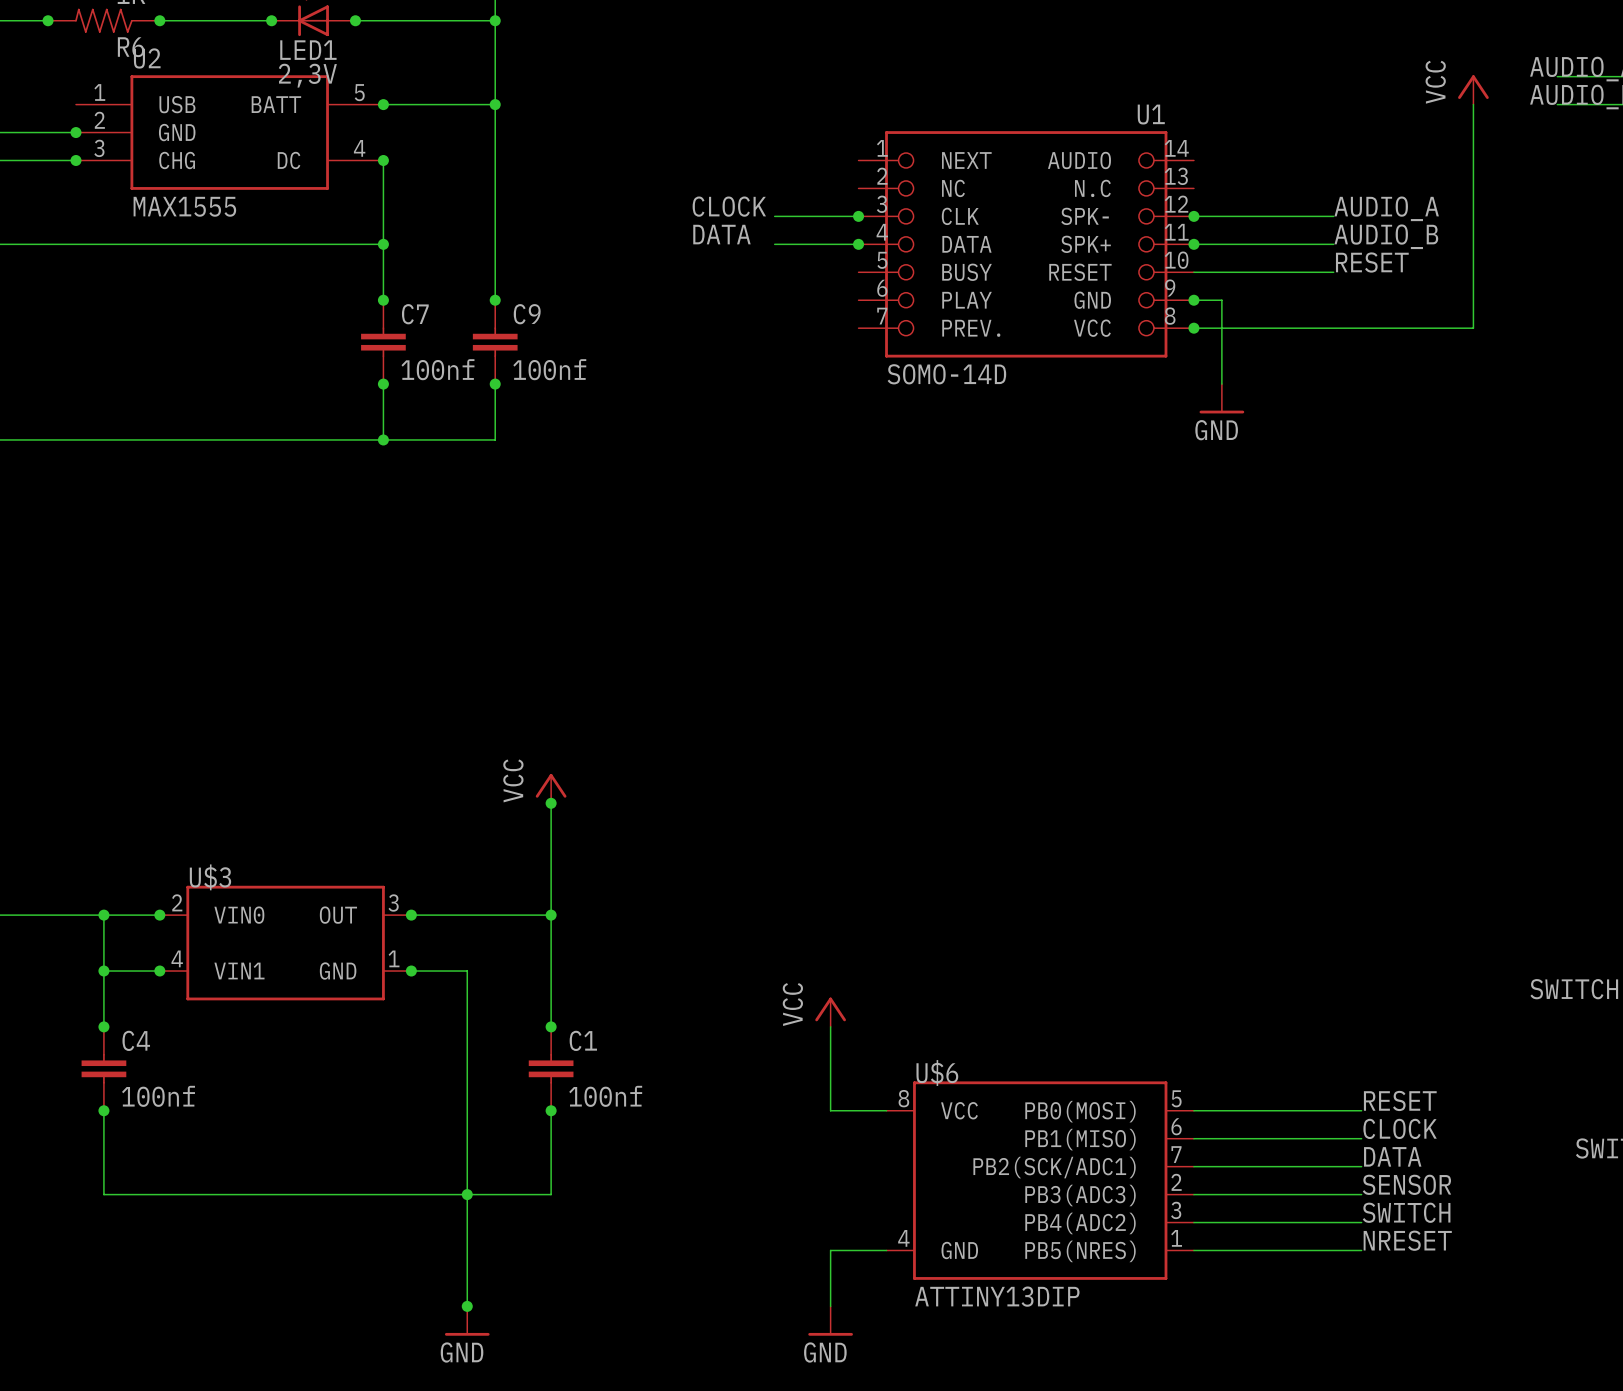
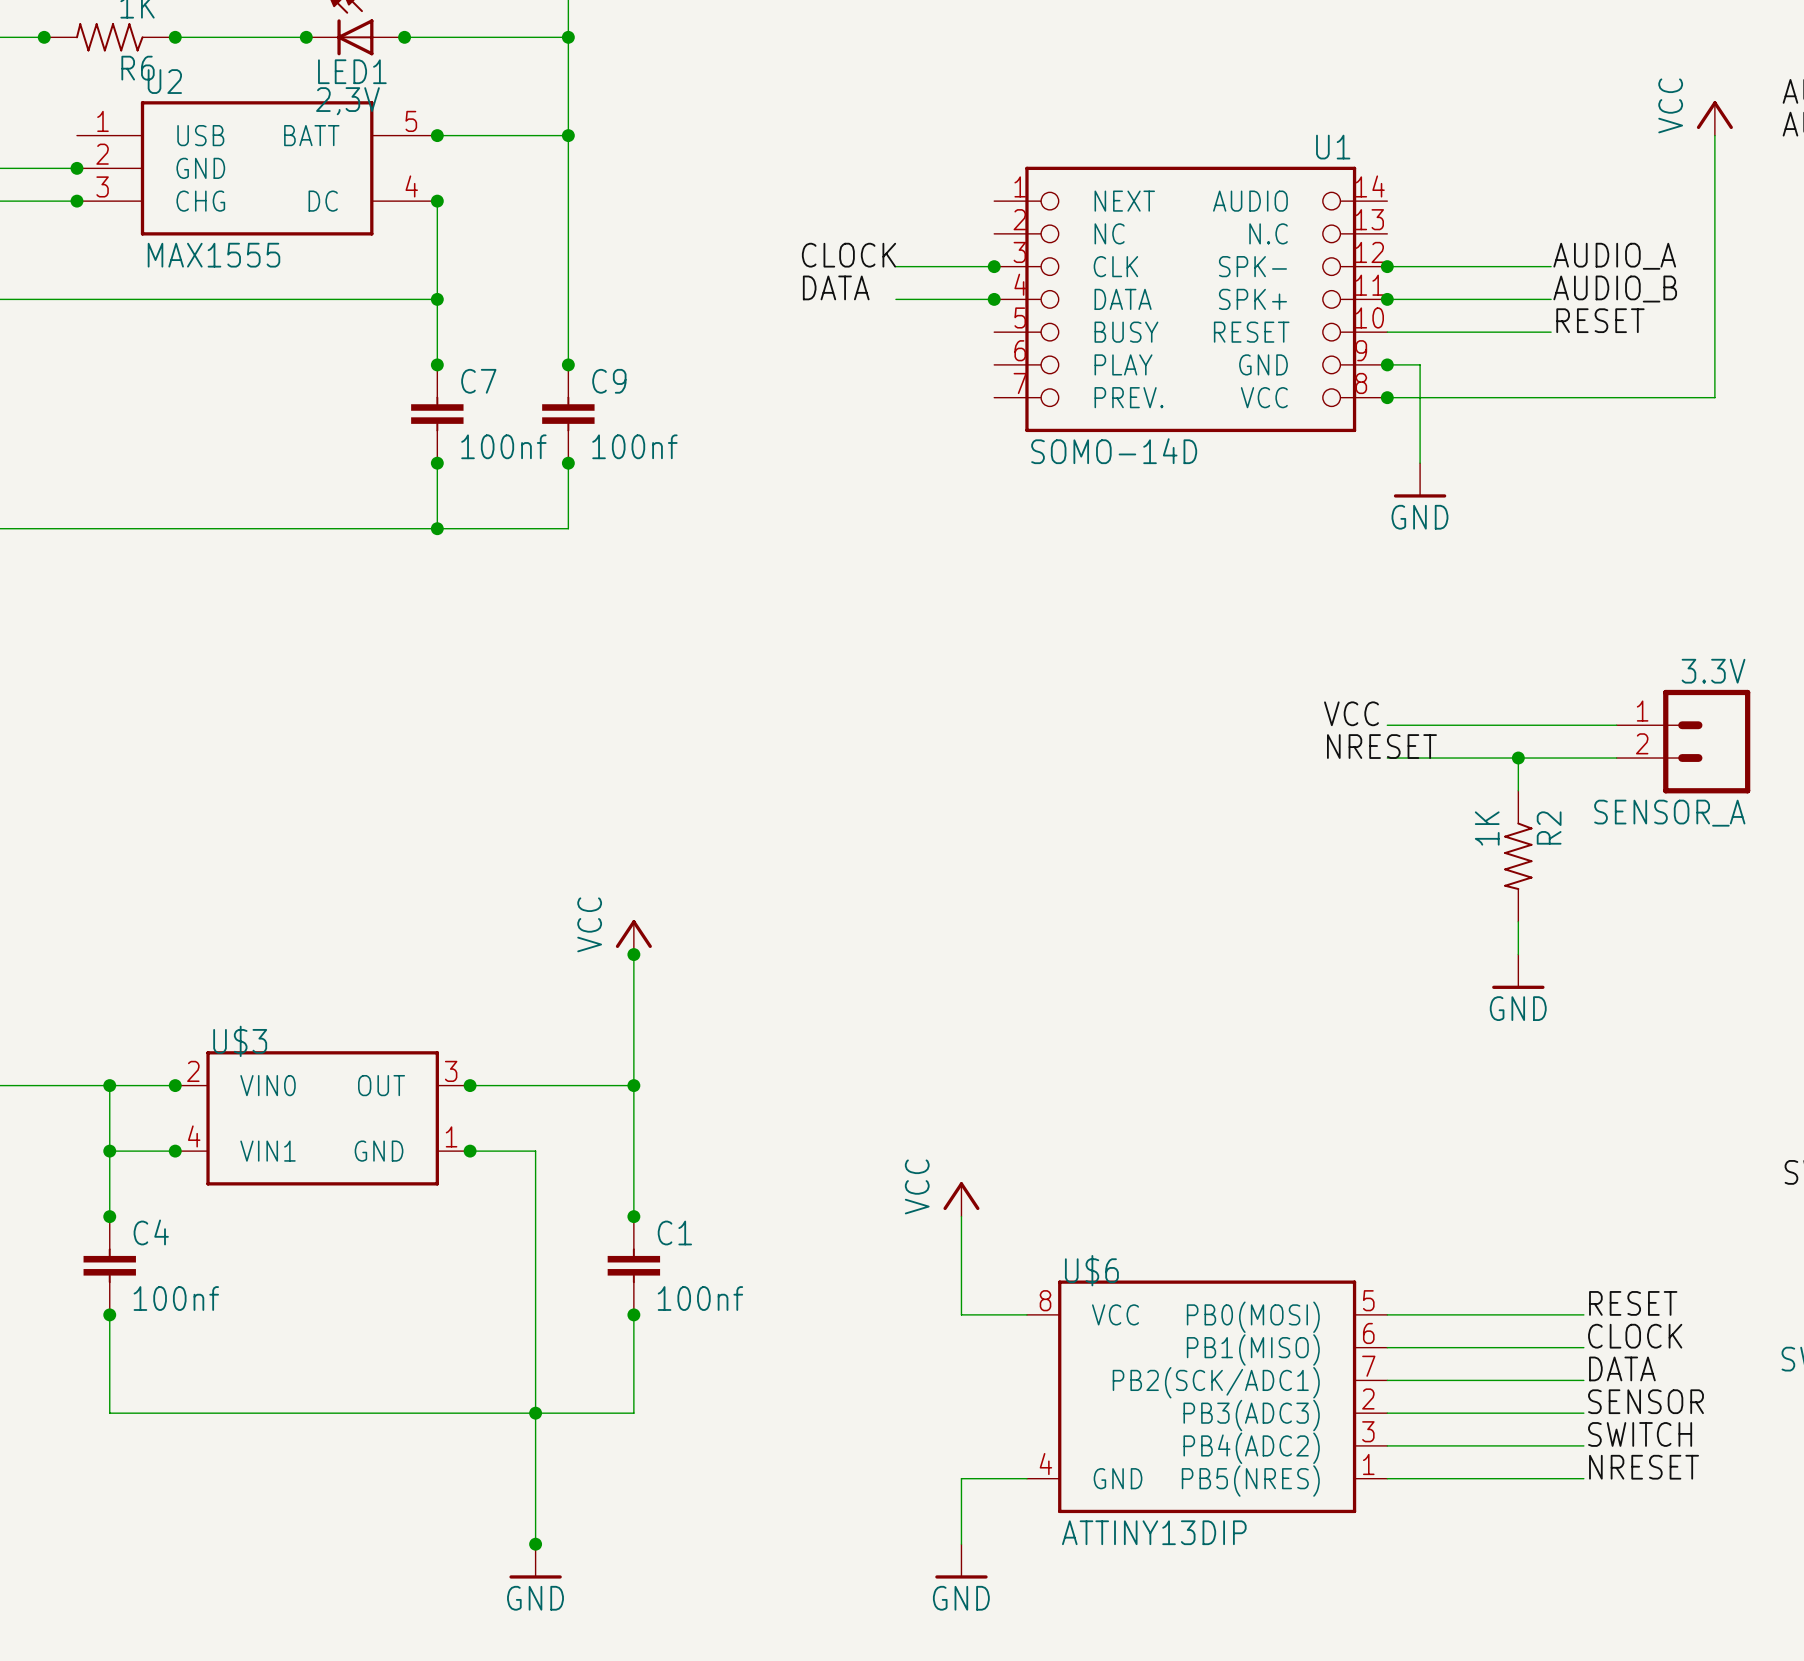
label: none -> VCC (1351, 713)
wire: none -> (1387, 725) (1616, 725)
SENSOR_A: none -> 3.3V (1683, 741)
label: none -> NRESET (1381, 746)
wire: none -> (1387, 758) (1616, 758)
wire: none -> (1518, 758) (1518, 790)
junction: none -> (1518, 758)
R2: none -> 1K (1518, 856)
wire: none -> (1518, 921) (1518, 954)
power symbol: none -> GND (1518, 971)

